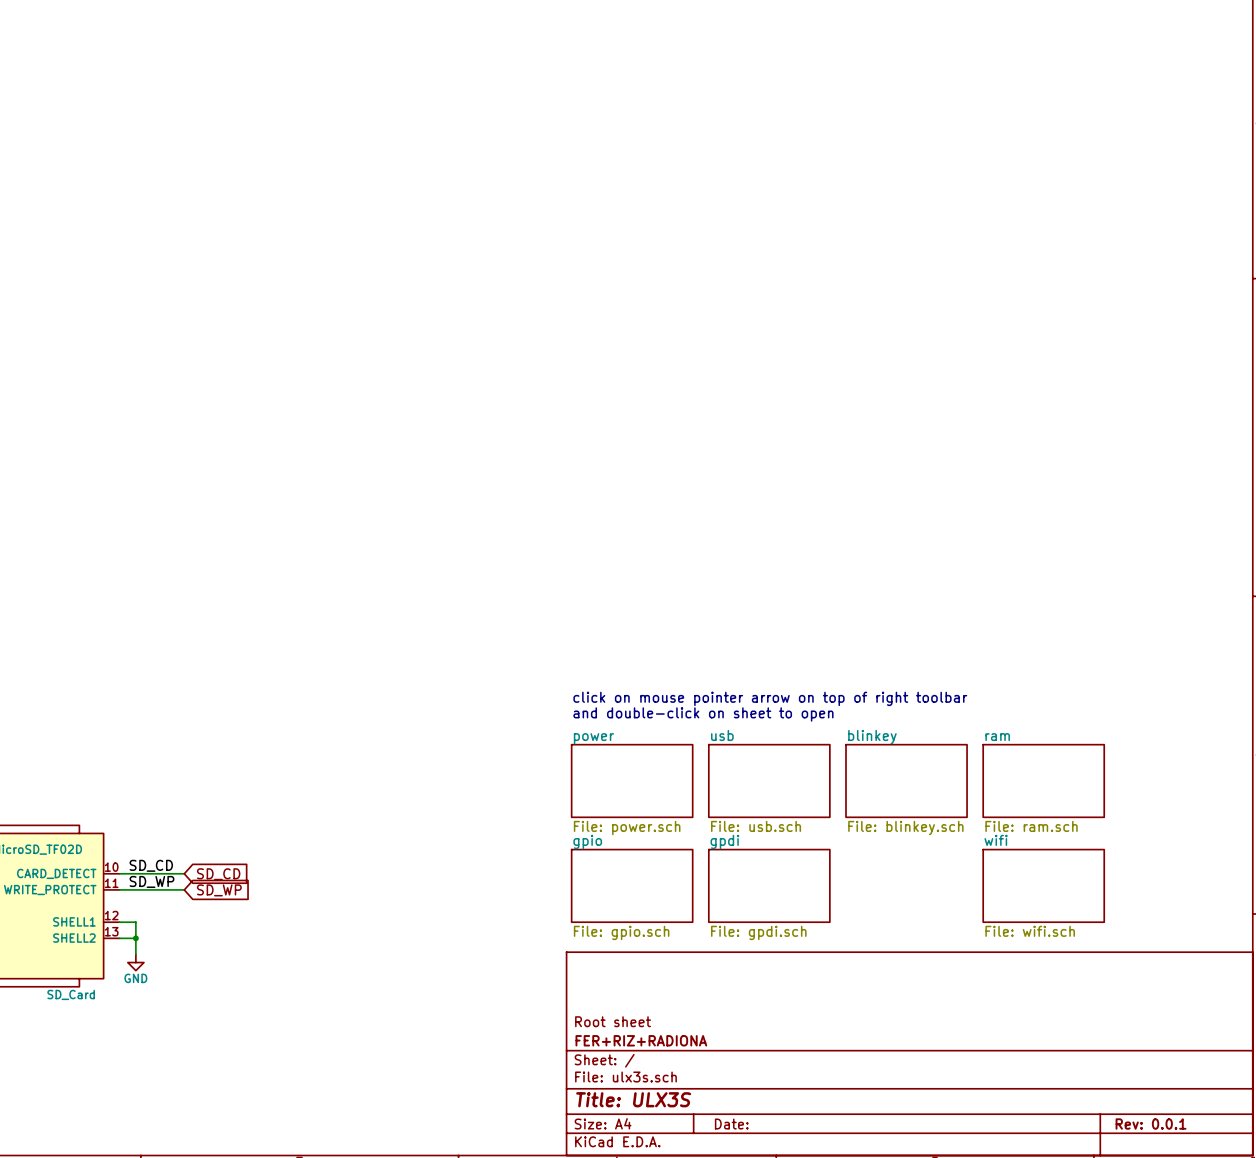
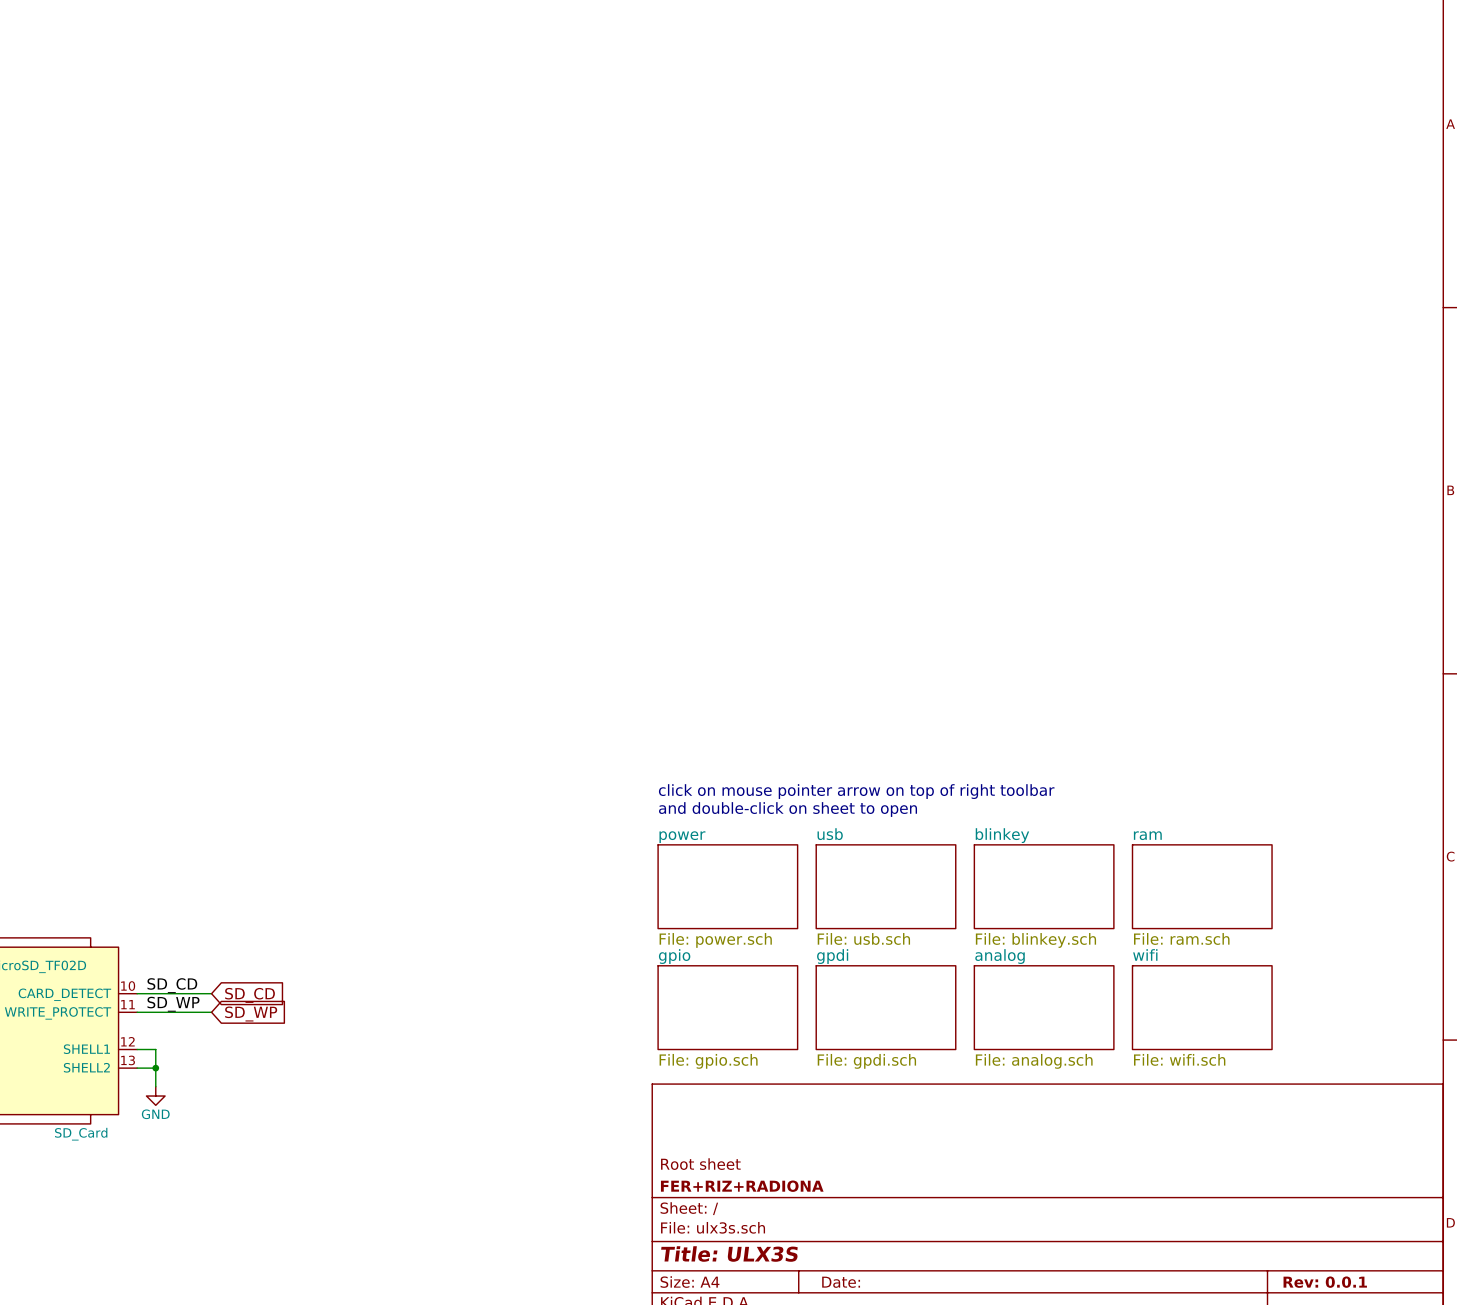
sheet analog: none -> File: analog.sch (1044, 1007)

